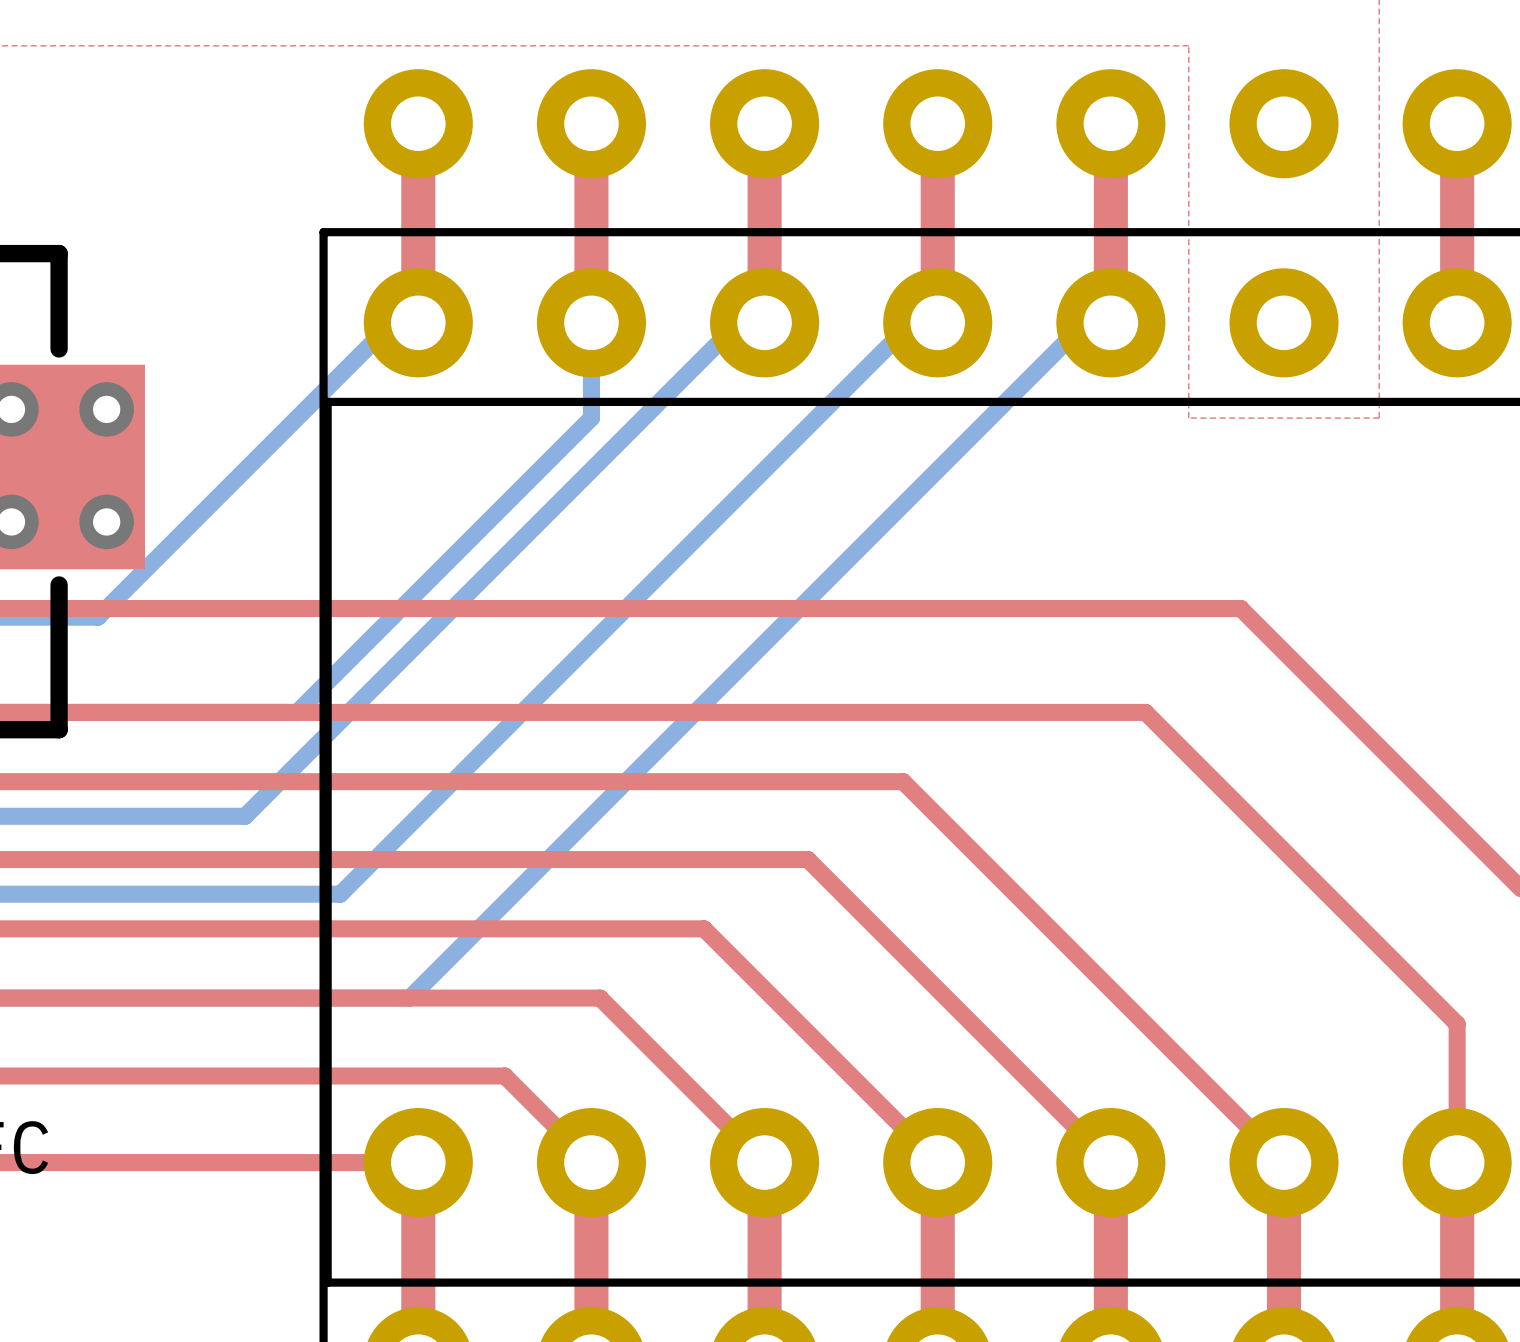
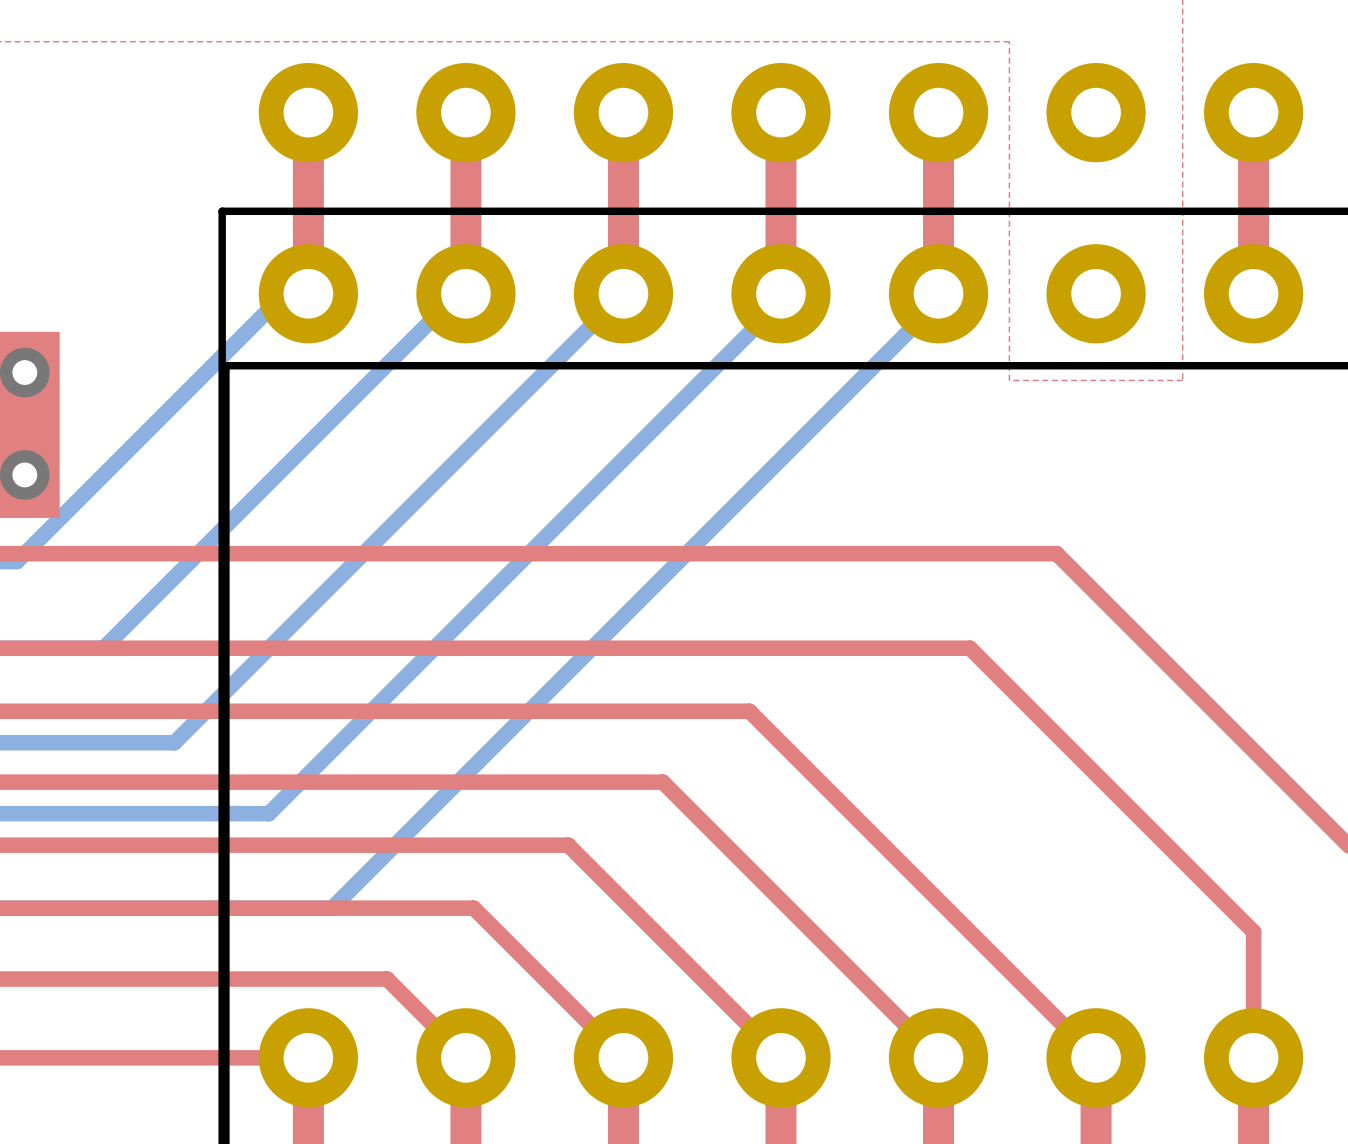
bottom track: (764, 296) (245, 816) -> (623, 270) (623, 293) (174, 742) (150, 742)
bottom track: (937, 296) (340, 894) -> (780, 293) (780, 301) (269, 813) (237, 813)
bottom track: (1110, 296) (409, 998) -> (938, 270) (938, 301) (332, 908) (300, 908)
bottom track: (591, 322) (591, 418) (297, 712) (193, 712) -> (465, 293) (458, 293) (103, 648)

